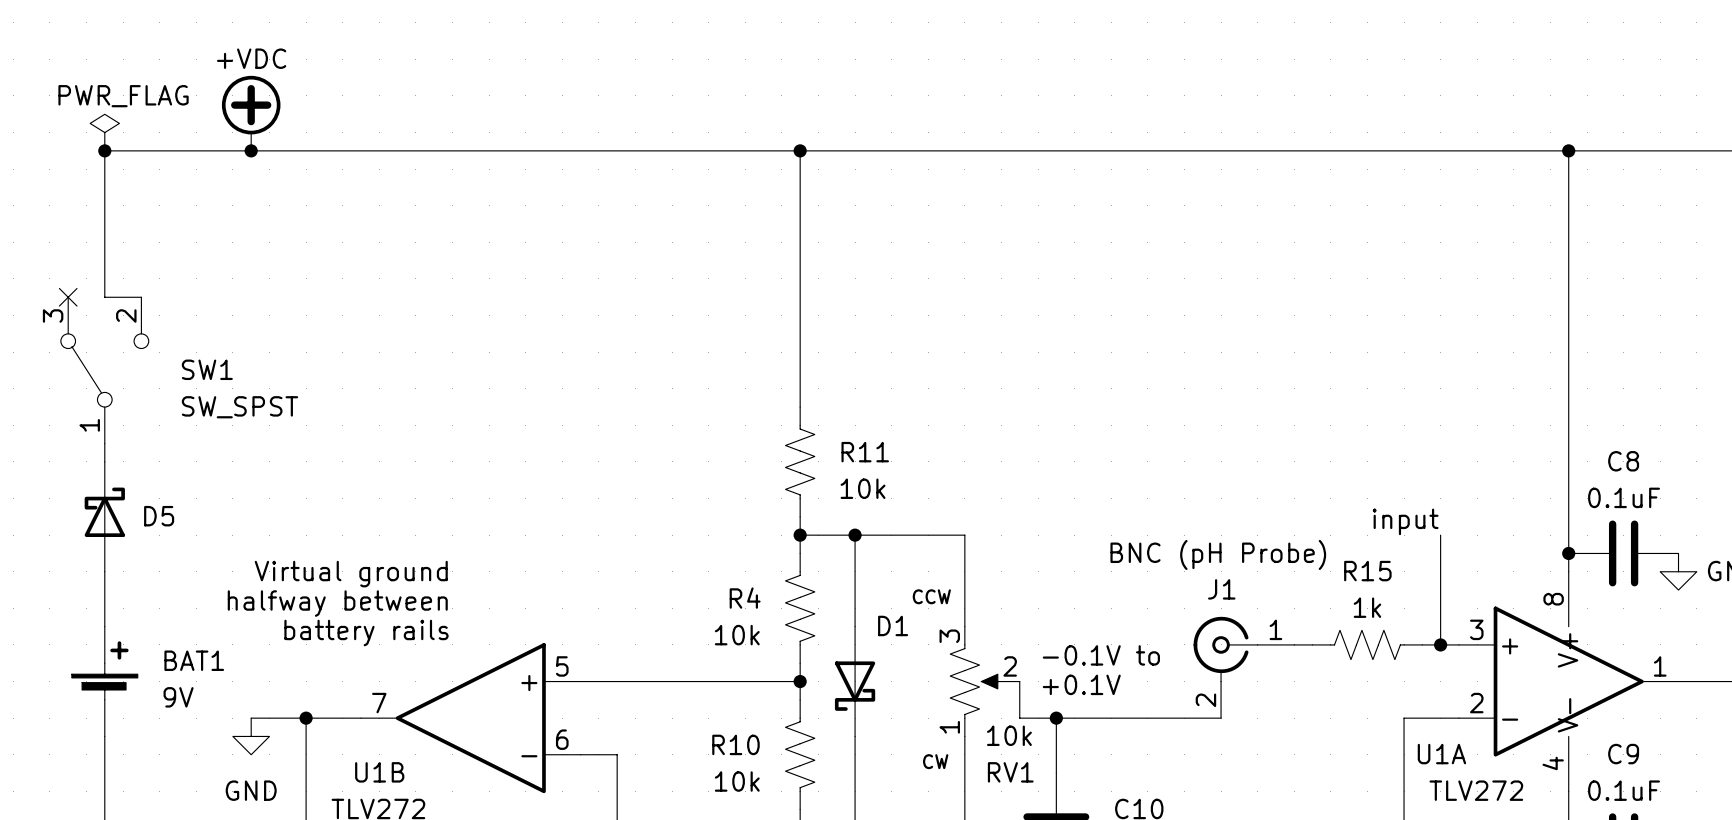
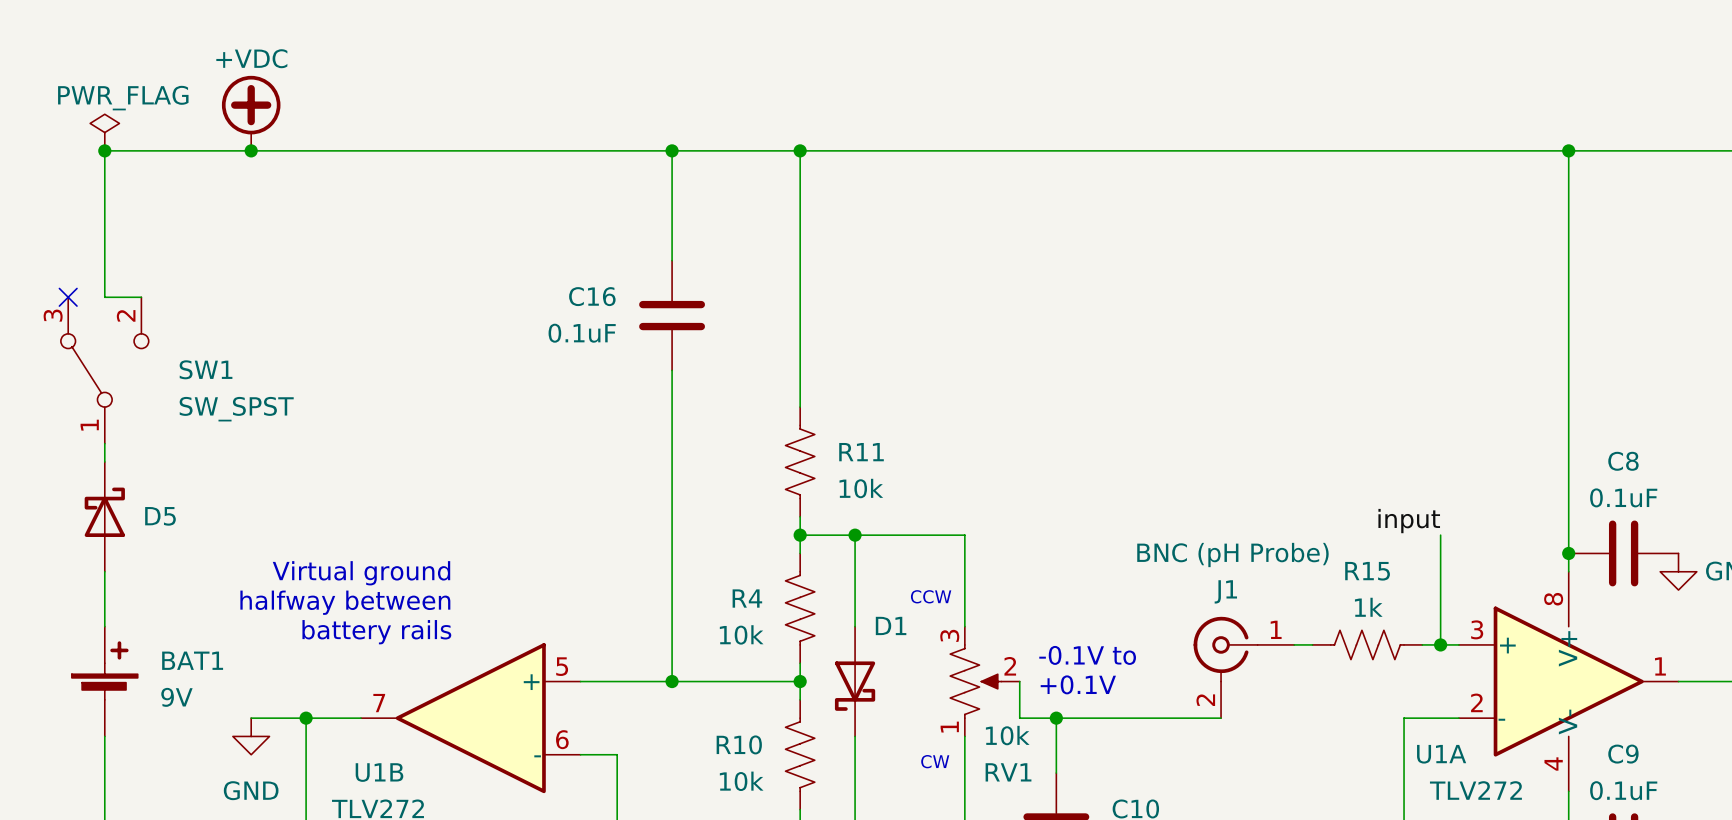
wire: none -> (672, 150) (672, 260)
junction: none -> (672, 150)
C16: none -> 0.1uF (672, 315)
wire: none -> (672, 370) (672, 681)
junction: none -> (672, 681)

